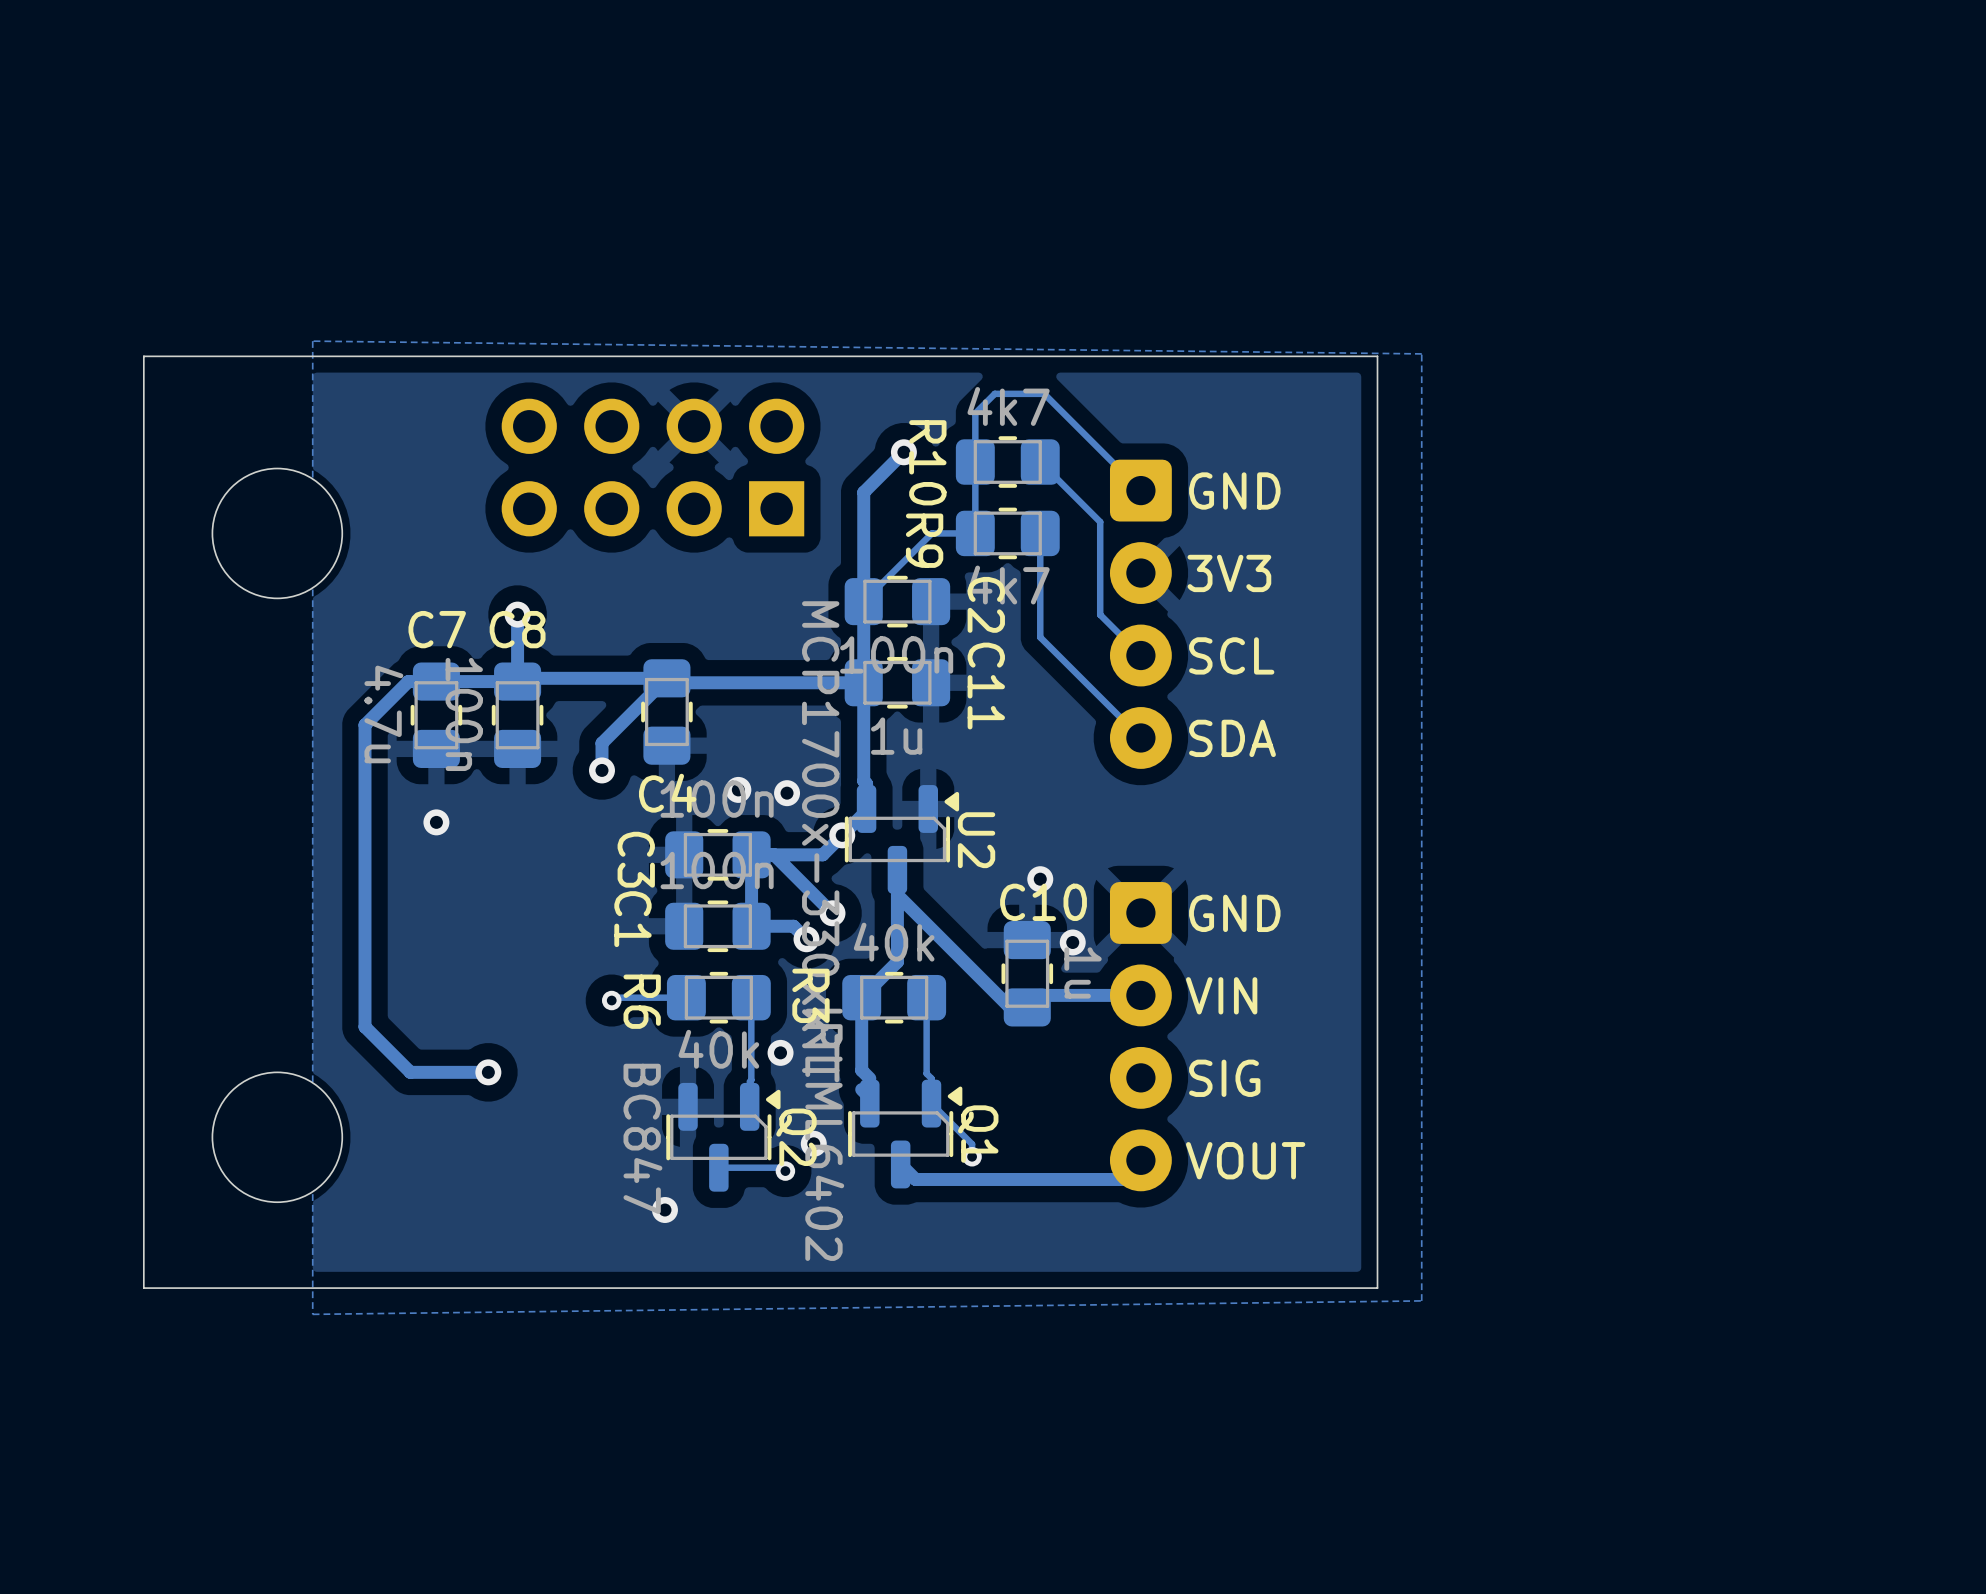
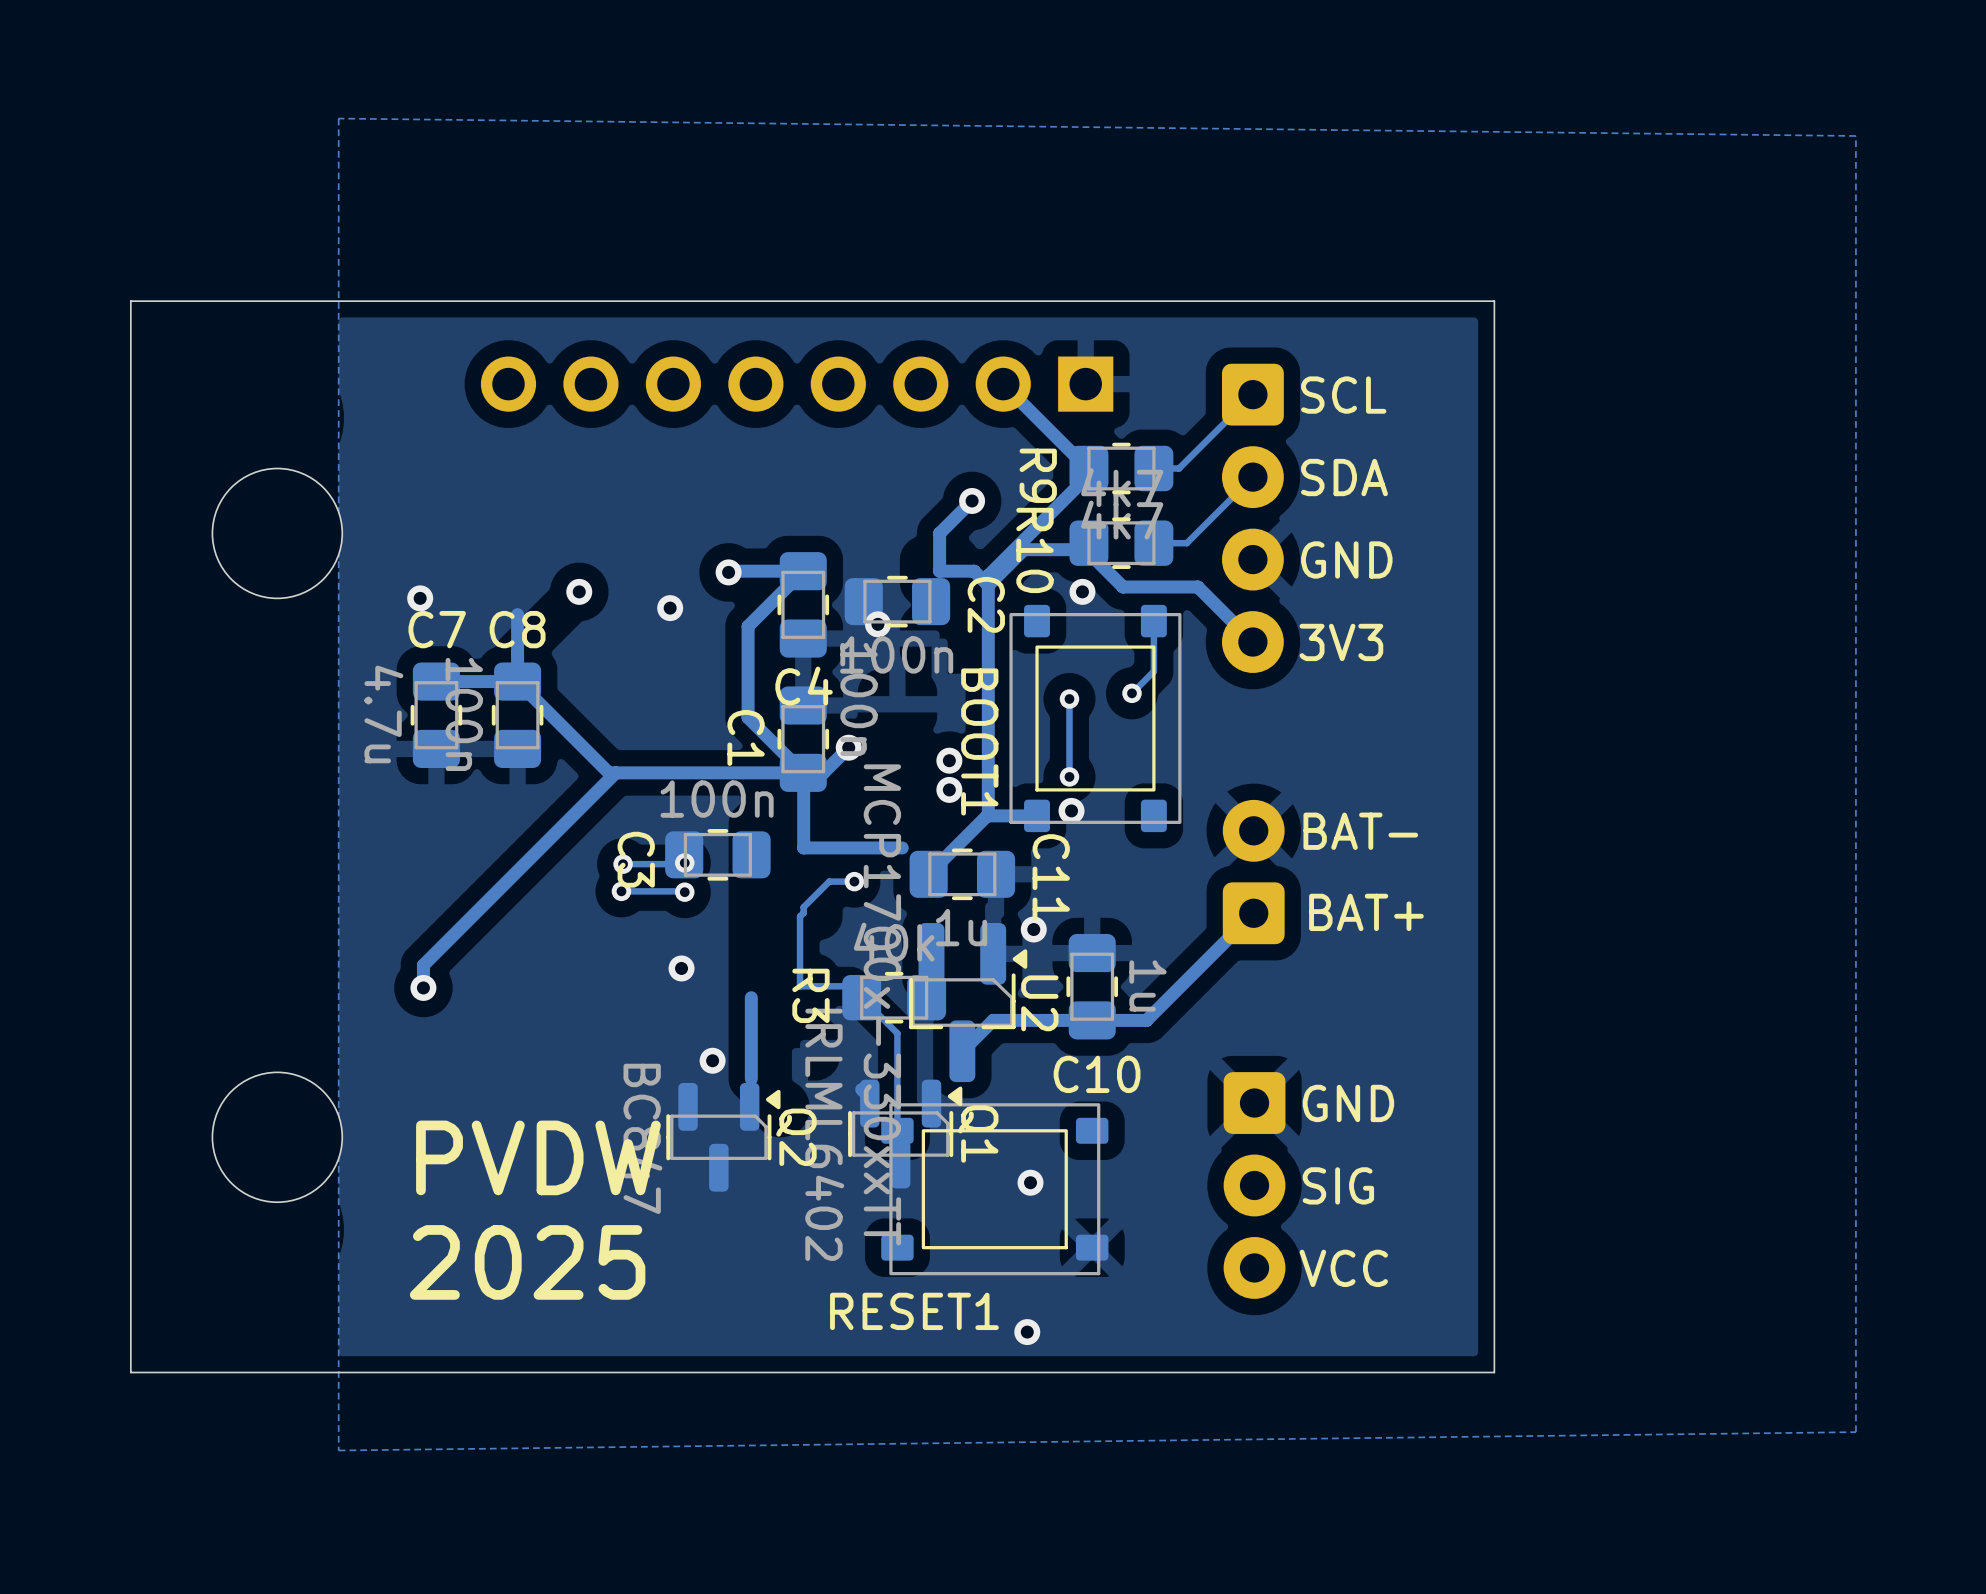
zone outline: (312, 341) (1421, 353) (1421, 1300) (312, 1314) (312, 341) -> (338, 118) (1855, 136) (1855, 1432) (338, 1450) (338, 118)
board edge: (1377, 356) (143, 356) (143, 1288) (1377, 1288) (1377, 356) -> (1494, 301) (1494, 1372) (130, 1372) (130, 301) (1494, 301)
part: none -> (797, 384)
track: none -> (1003, 384) (1085, 466) (1085, 478) (988, 575) (988, 814) (928, 874)
track: none -> (1252, 394) (1179, 468) (1153, 468)
track: (903, 452) (863, 492) (863, 781) (866, 783) (866, 811) (822, 854) (751, 854) (751, 926) (793, 926) (806, 939) -> none
via position: (903, 452) -> (972, 500)
R10 name position: R10 (927, 462) -> R10 (1034, 550)
R10 position: (1007, 462) -> (1121, 543)
track: (1040, 462) (1100, 521) (1100, 614) (1140, 655) -> none
part: (652, 467) -> none
track: none -> (1252, 477) (1186, 543) (1153, 543)
track: (1140, 490) (1044, 393) (994, 393) (975, 413) (975, 533) (931, 533) (863, 601) -> none
track: none -> (972, 500) (939, 533) (939, 571) (974, 571) (988, 585) (1024, 549) (1085, 549) (1123, 587) (1197, 587) (1252, 642)
part: none -> (1252, 518)
R9 position: (1007, 533) -> (1121, 468)
track: (1040, 533) (1040, 637) (1140, 737) -> none
track: none -> (728, 572) (803, 571) (748, 626) (748, 717) (803, 773) (803, 847) (902, 847)
via: none -> (728, 572)
via: none -> (579, 591)
via: none -> (1082, 591)
via: none -> (420, 598)
via: none -> (670, 608)
via: (517, 614) -> none
part: (1140, 614) -> none
track: none -> (1153, 621) (1153, 671) (1132, 693)
via: none -> (877, 624)
track: (666, 678) (520, 678) (517, 681) -> (848, 747) (823, 772) (608, 772) (517, 681)
track: (666, 678) (601, 743) (601, 770) -> none
track: (666, 678) (671, 682) (868, 682) -> none
track: (436, 681) (408, 681) (365, 724) (365, 1026) (410, 1072) (488, 1072) -> none
C11 position: (897, 682) -> (962, 874)
via: none -> (1132, 693)
track: none -> (1069, 699) (1069, 776)
via: none -> (1069, 699)
C4 position: (666, 711) -> (803, 604)
BOOT1: none -> (1095, 718)
via: none -> (848, 747)
via: none -> (949, 760)
via: (601, 770) -> none
track: none -> (615, 772) (423, 965) (423, 987)
via: none -> (1069, 776)
U2 footprint: [844, 785, 960, 894] -> [909, 923, 1028, 1083]
via: (738, 789) -> none
via: none -> (949, 789)
via: (787, 793) -> none
via: none -> (1071, 810)
track: none -> (1037, 815) (987, 815)
via: (436, 822) -> none
via: (842, 835) -> none
track: (774, 854) (832, 913) -> none
track: none -> (684, 862) (623, 864)
via: none -> (684, 862)
via: none -> (623, 864)
part: none -> (1253, 872)
via: (1040, 879) -> none
track: none -> (854, 881) (829, 881) (803, 907) (803, 912) (800, 916) (800, 986) (850, 986) (897, 1033) (897, 1130)
via: none -> (854, 881)
track: none -> (621, 891) (684, 892)
via: none -> (621, 891)
via: none -> (684, 892)
C10 name position: C10 (1043, 902) -> C10 (1097, 1074)
via: (832, 913) -> none
track: none -> (1253, 913) (1146, 1020) (993, 1020) (962, 1051)
C1 rotation: 0° (717, 926) -> 90° clockwise (803, 739)
C1 position: (717, 926) -> (803, 739)
via: none -> (1033, 929)
via: (806, 939) -> none
via: (1072, 942) -> none
via: none -> (681, 968)
C10 position: (1027, 973) -> (1092, 986)
via: none -> (423, 987)
track: (1140, 995) (1039, 995) (1027, 1007) (1009, 1007) (897, 894) (897, 961) (861, 997) (861, 1070) (869, 1078) -> none
track: (686, 997) (614, 997) (611, 1000) -> none
R6: 40k (718, 997) -> none
track width: thin (751, 997) (751, 1078) -> thick (751, 997) (751, 1078)
track: (926, 997) (926, 1073) (931, 1078) (931, 1093) -> none
via: (611, 1000) -> none
part: (1140, 1036) -> none
via: (780, 1052) -> none
via: none -> (712, 1060)
via: (488, 1072) -> none
track: (931, 1103) (972, 1144) (972, 1156) -> none
via: (813, 1143) -> none
via: (972, 1156) -> none
text: none -> PVDW (538, 1157)
track: (1140, 1160) (1121, 1179) (915, 1179) (900, 1164) -> none
track: (718, 1167) (781, 1167) (785, 1171) -> none
via: (785, 1171) -> none
via: none -> (1030, 1182)
part: none -> (1254, 1185)
RESET1: none -> (994, 1189)
via: (664, 1210) -> none
text: none -> 2025 (527, 1262)
via: none -> (1027, 1332)

